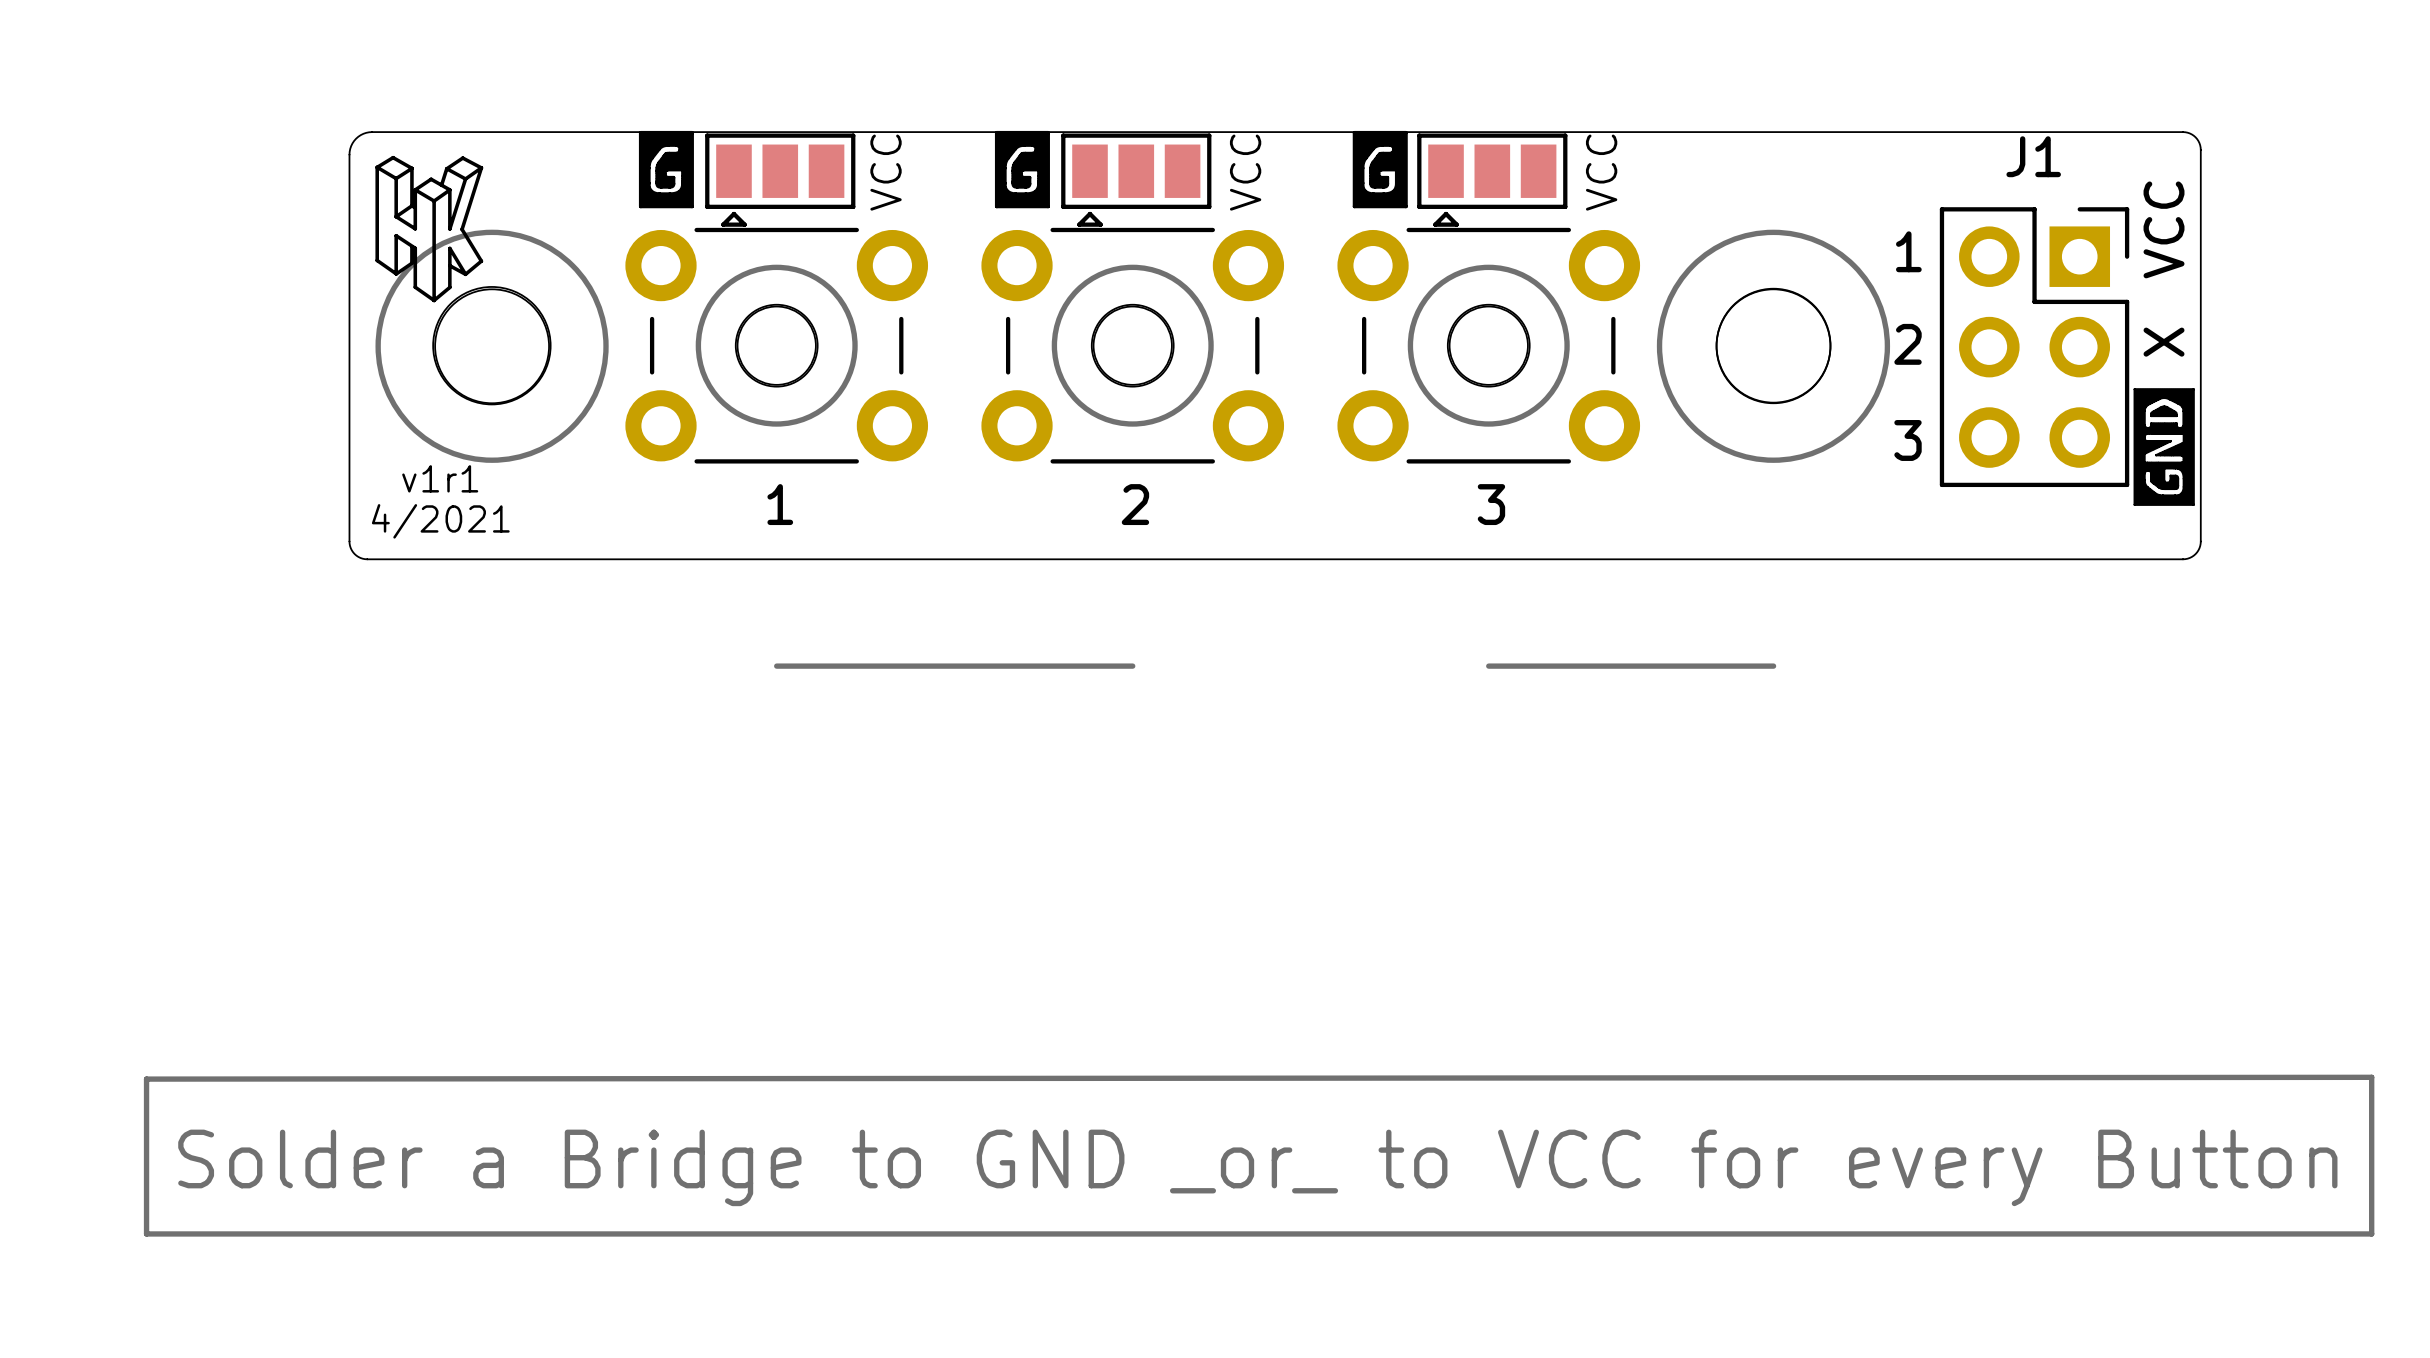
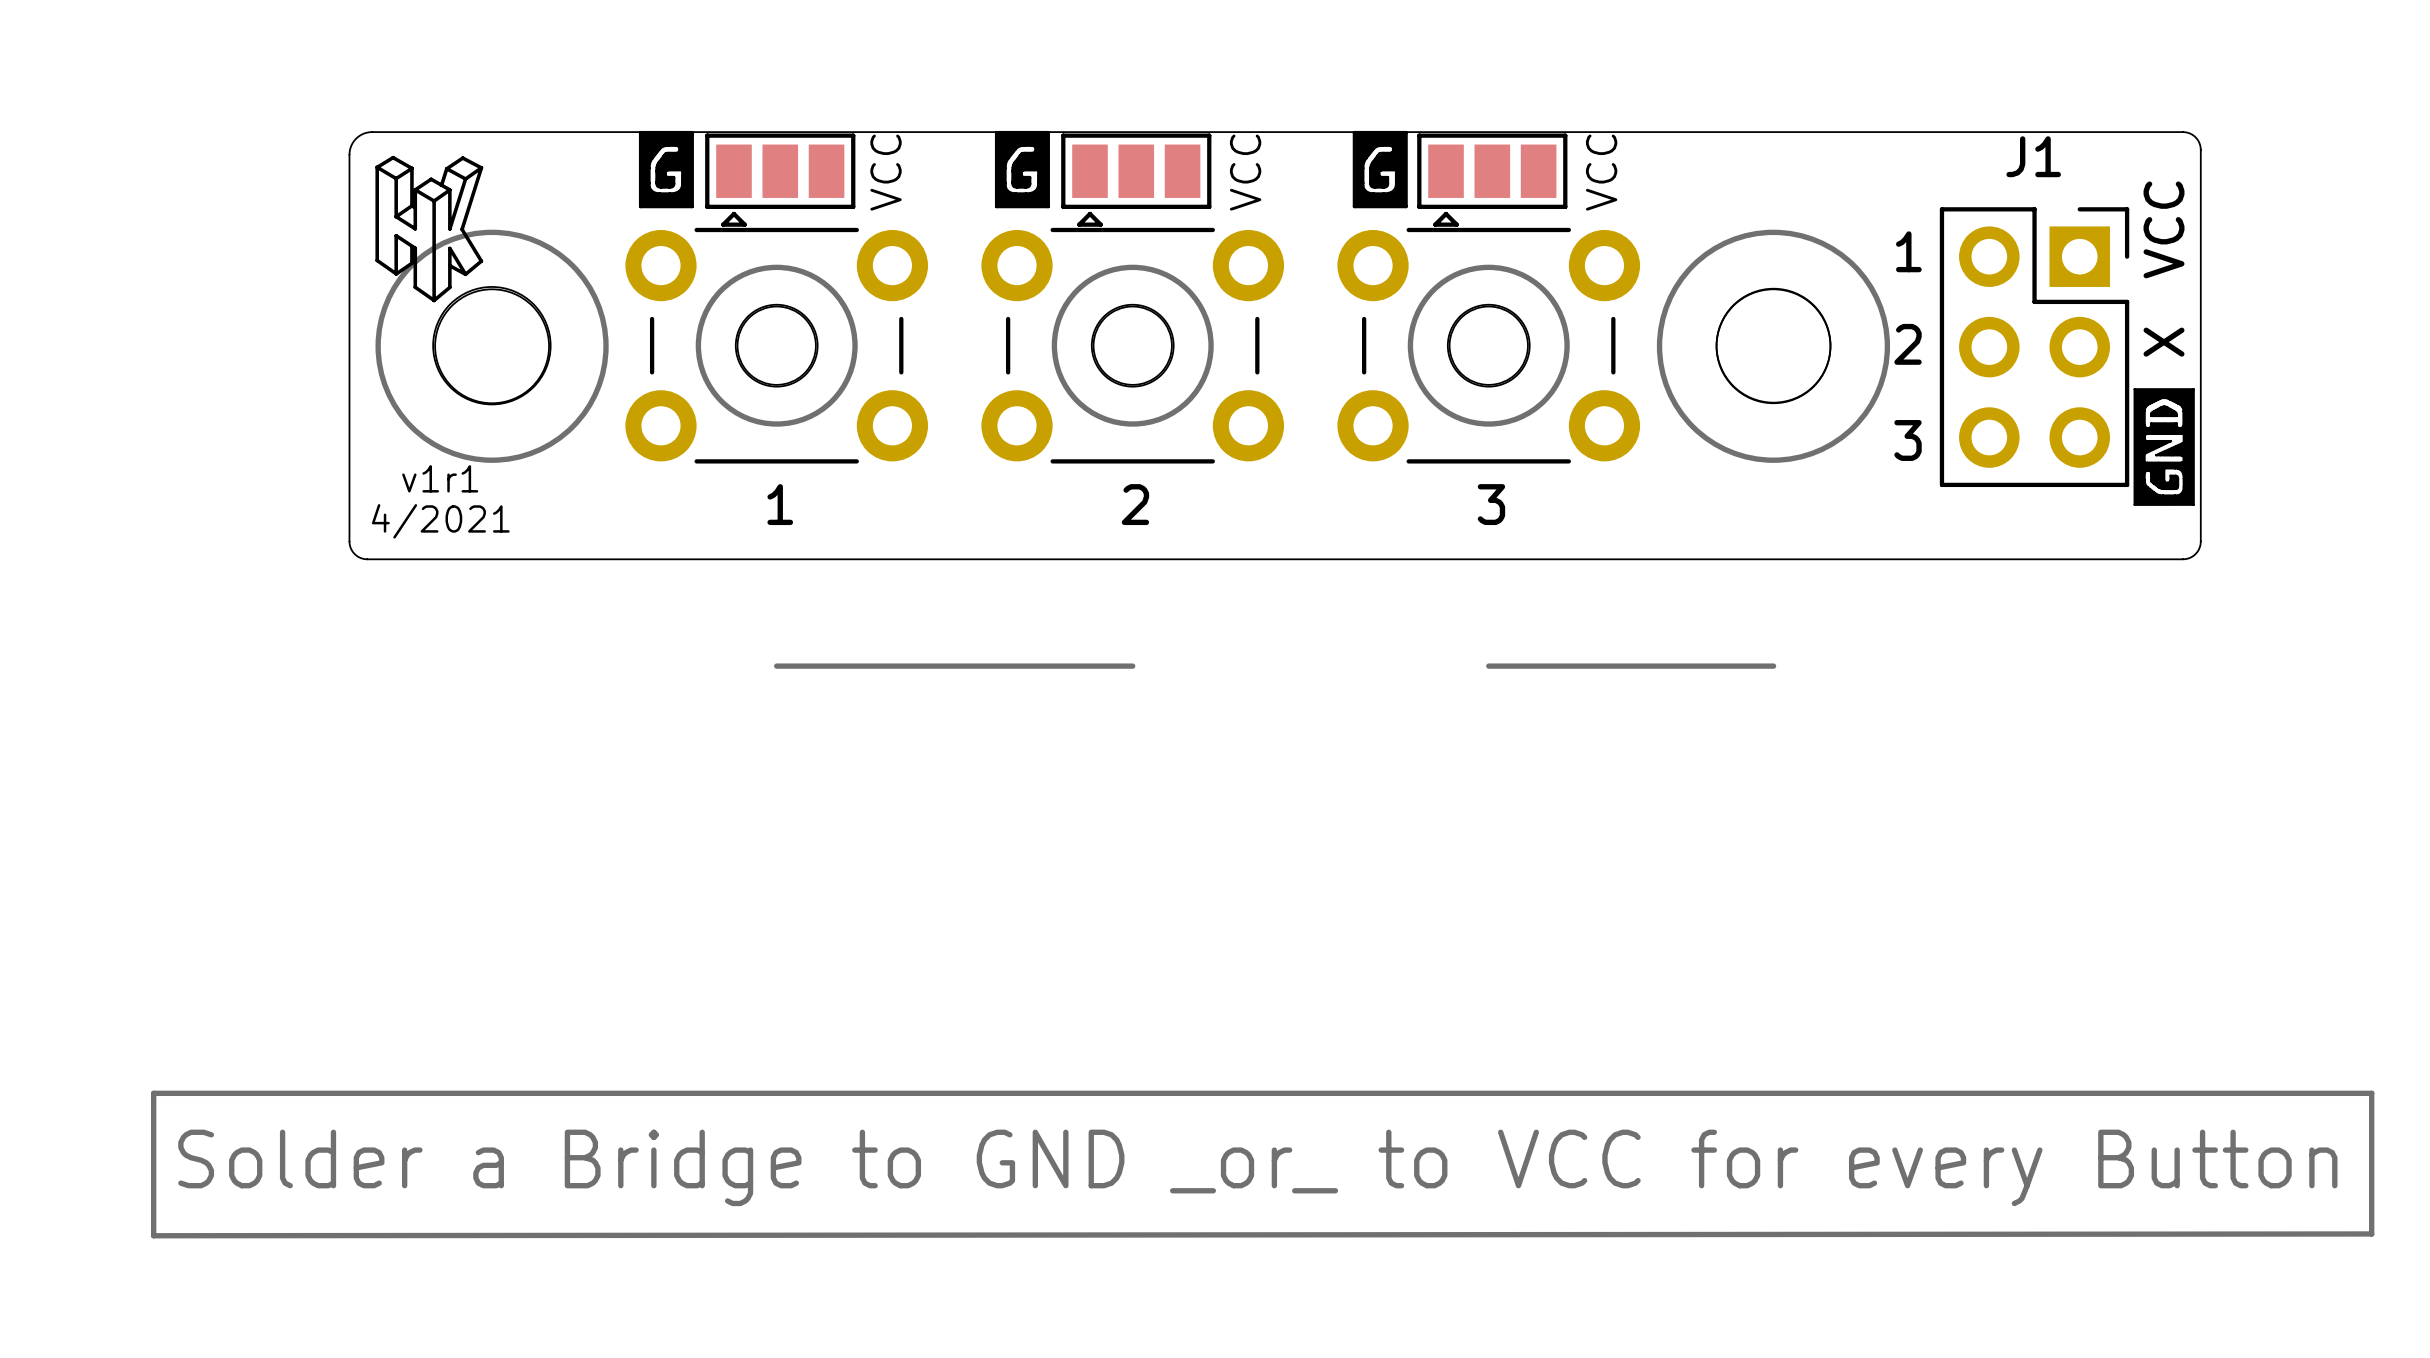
line: (2371, 1093) (2371, 1077) (146, 1079) (146, 1233) (2371, 1233) -> (2371, 1093) (153, 1093) (153, 1235) (2371, 1233)

